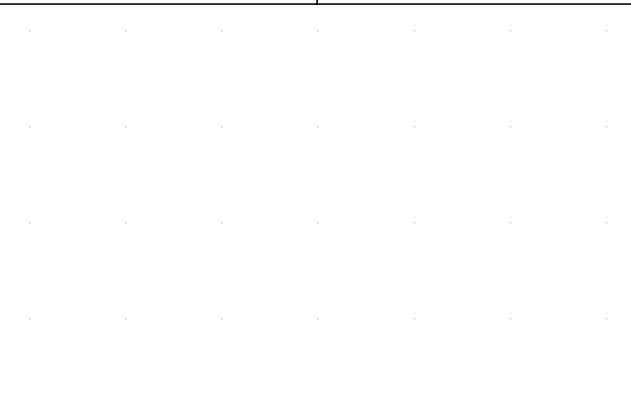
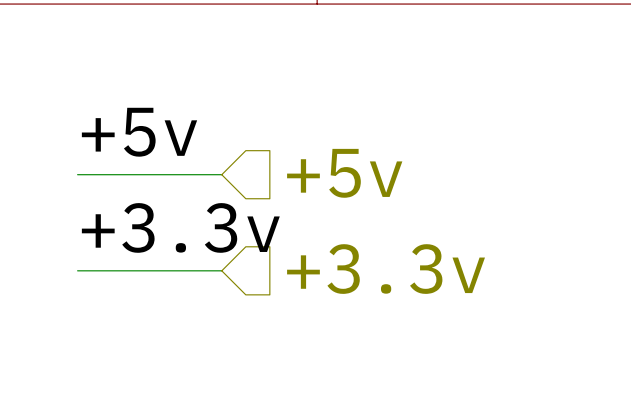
label: none -> +5v (139, 132)
hierarchical label: none -> +5v (344, 173)
wire: none -> (77, 174) (221, 174)
label: none -> +3.3v (180, 227)
hierarchical label: none -> +3.3v (386, 269)
wire: none -> (77, 270) (221, 270)

